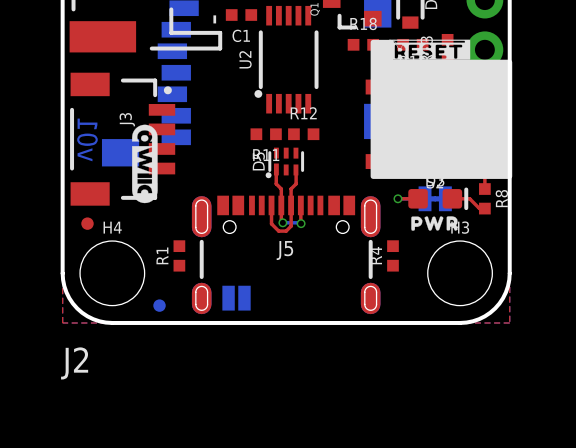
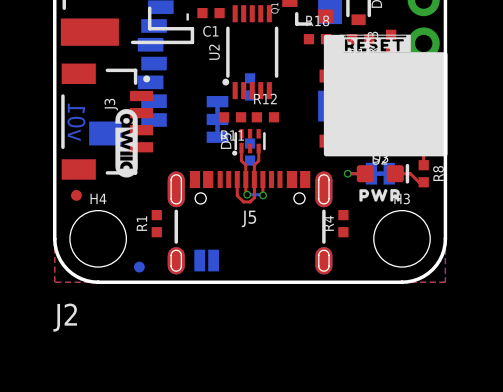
part: none -> (250, 86)
part: none -> (217, 119)
part: none -> (250, 152)

